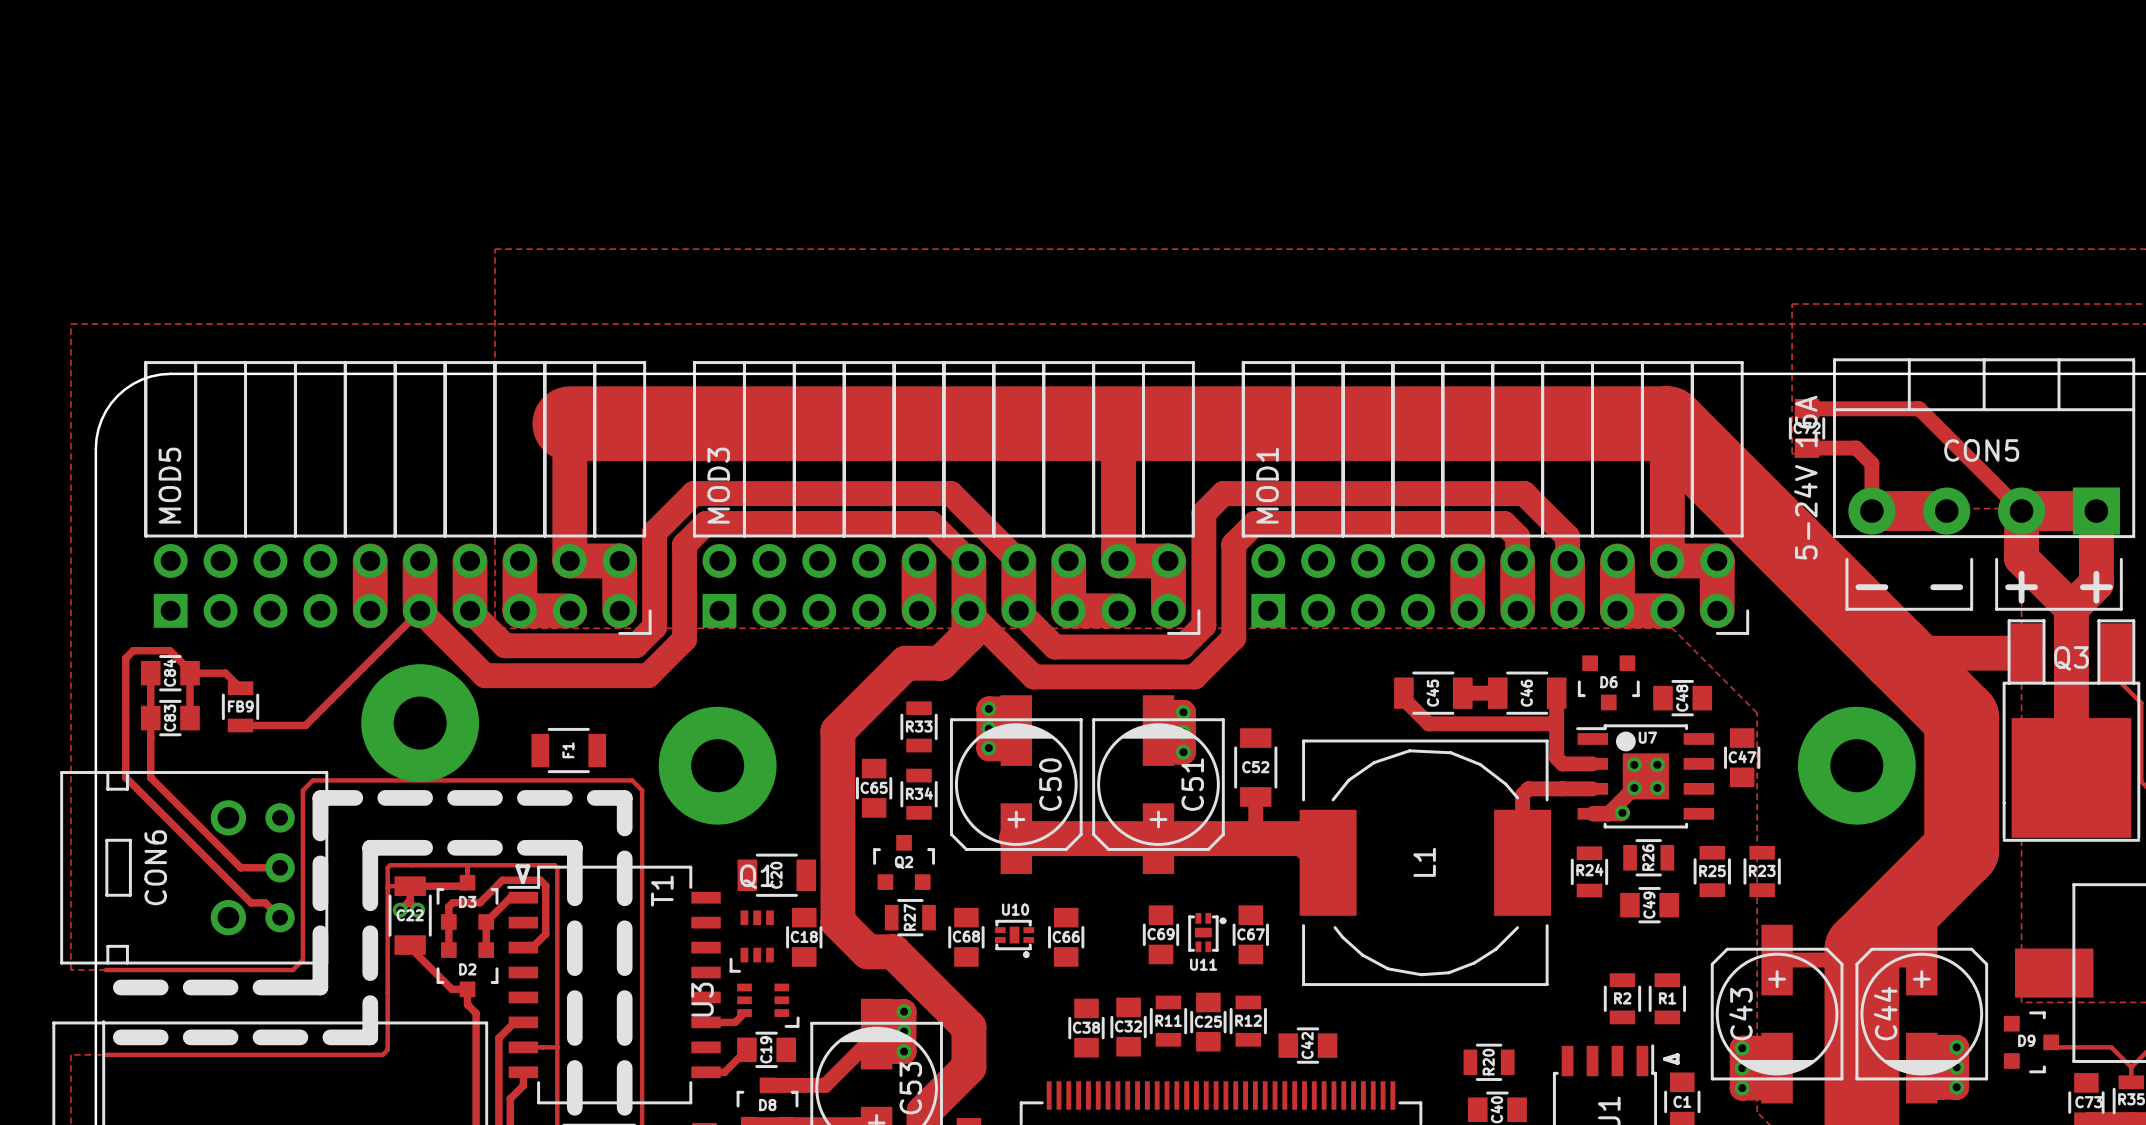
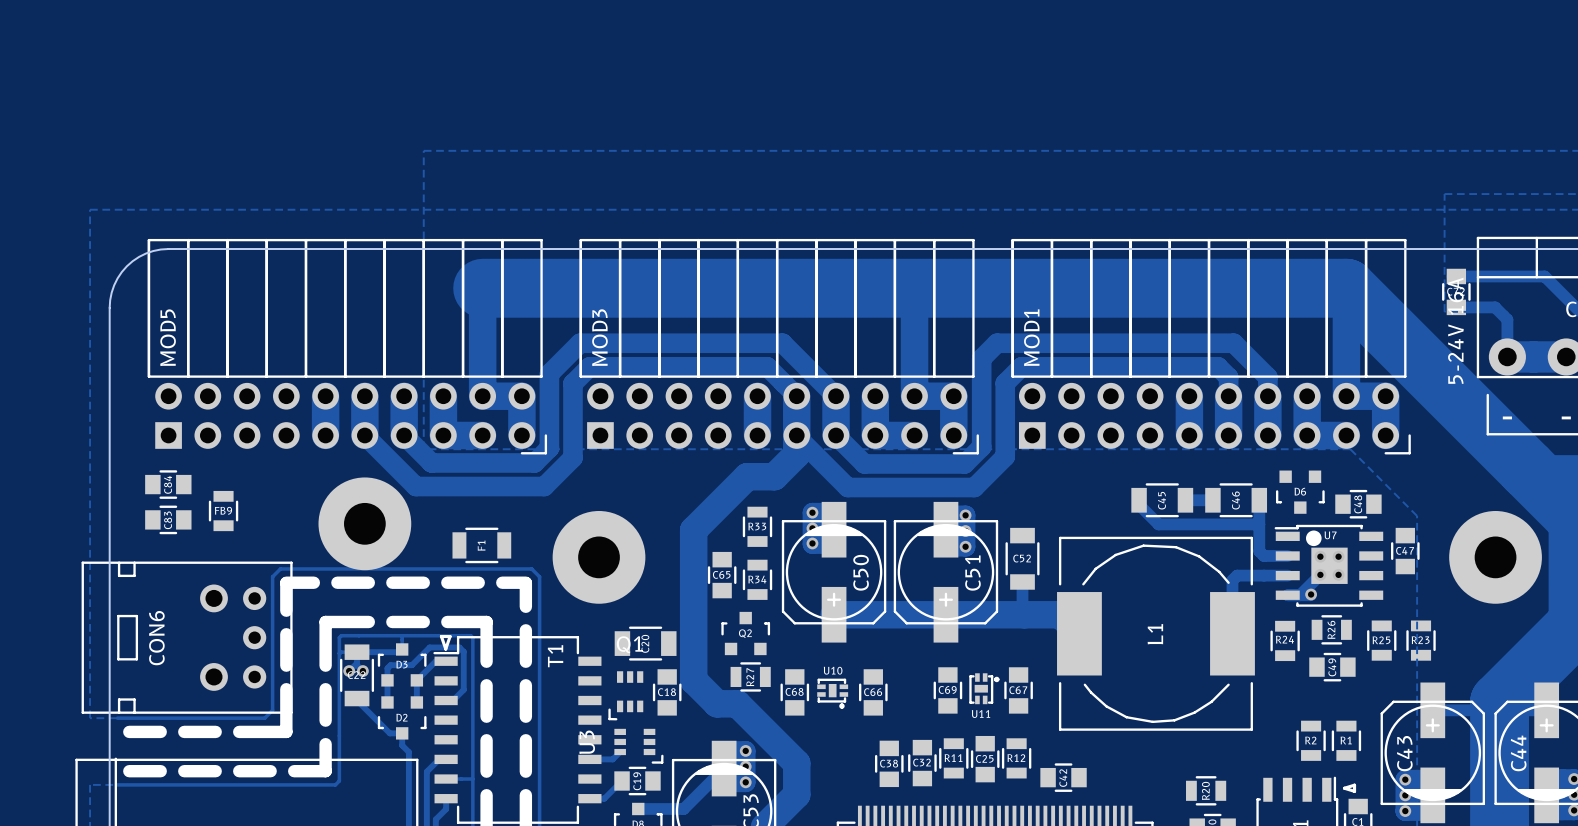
track: (420, 610) (305, 725) (240, 725) -> none
track: (150, 673) (150, 777) (240, 867) (280, 867) -> none
track: (190, 673) (225, 673) (240, 688) -> none
track: (190, 718) (190, 670) (170, 650) (133, 650) (125, 658) (125, 777) (251, 902) (265, 902) (280, 917) -> none

